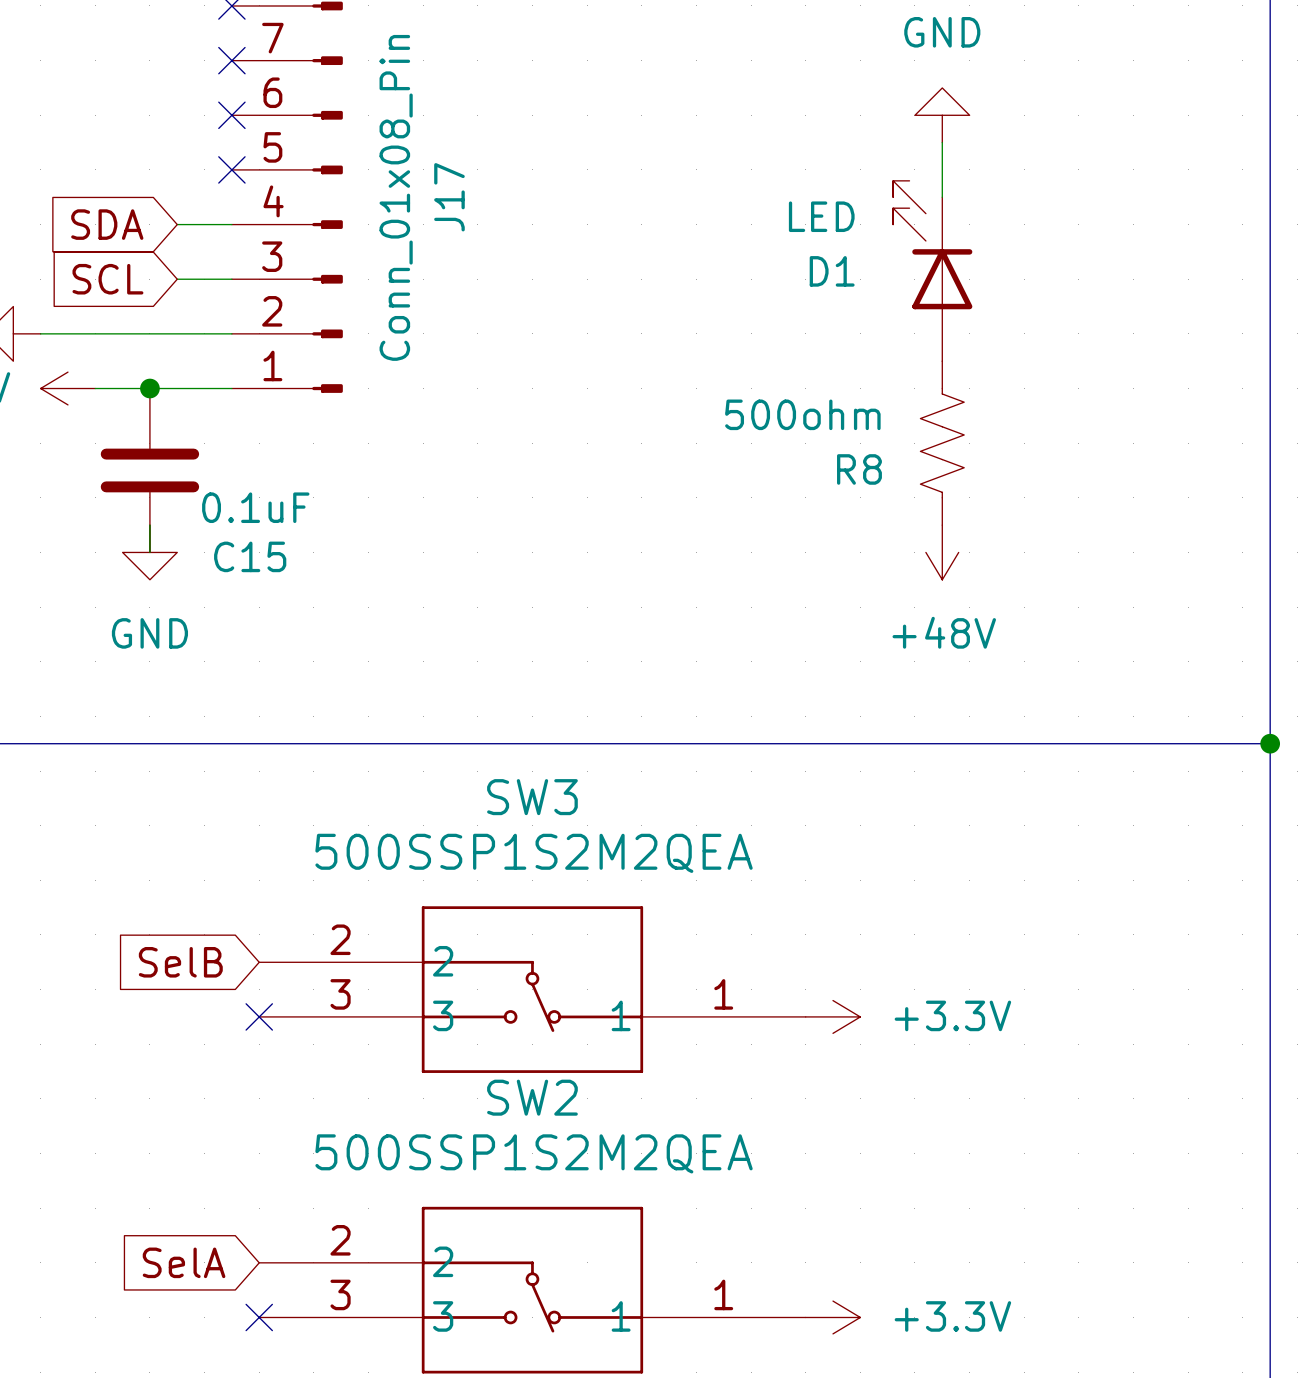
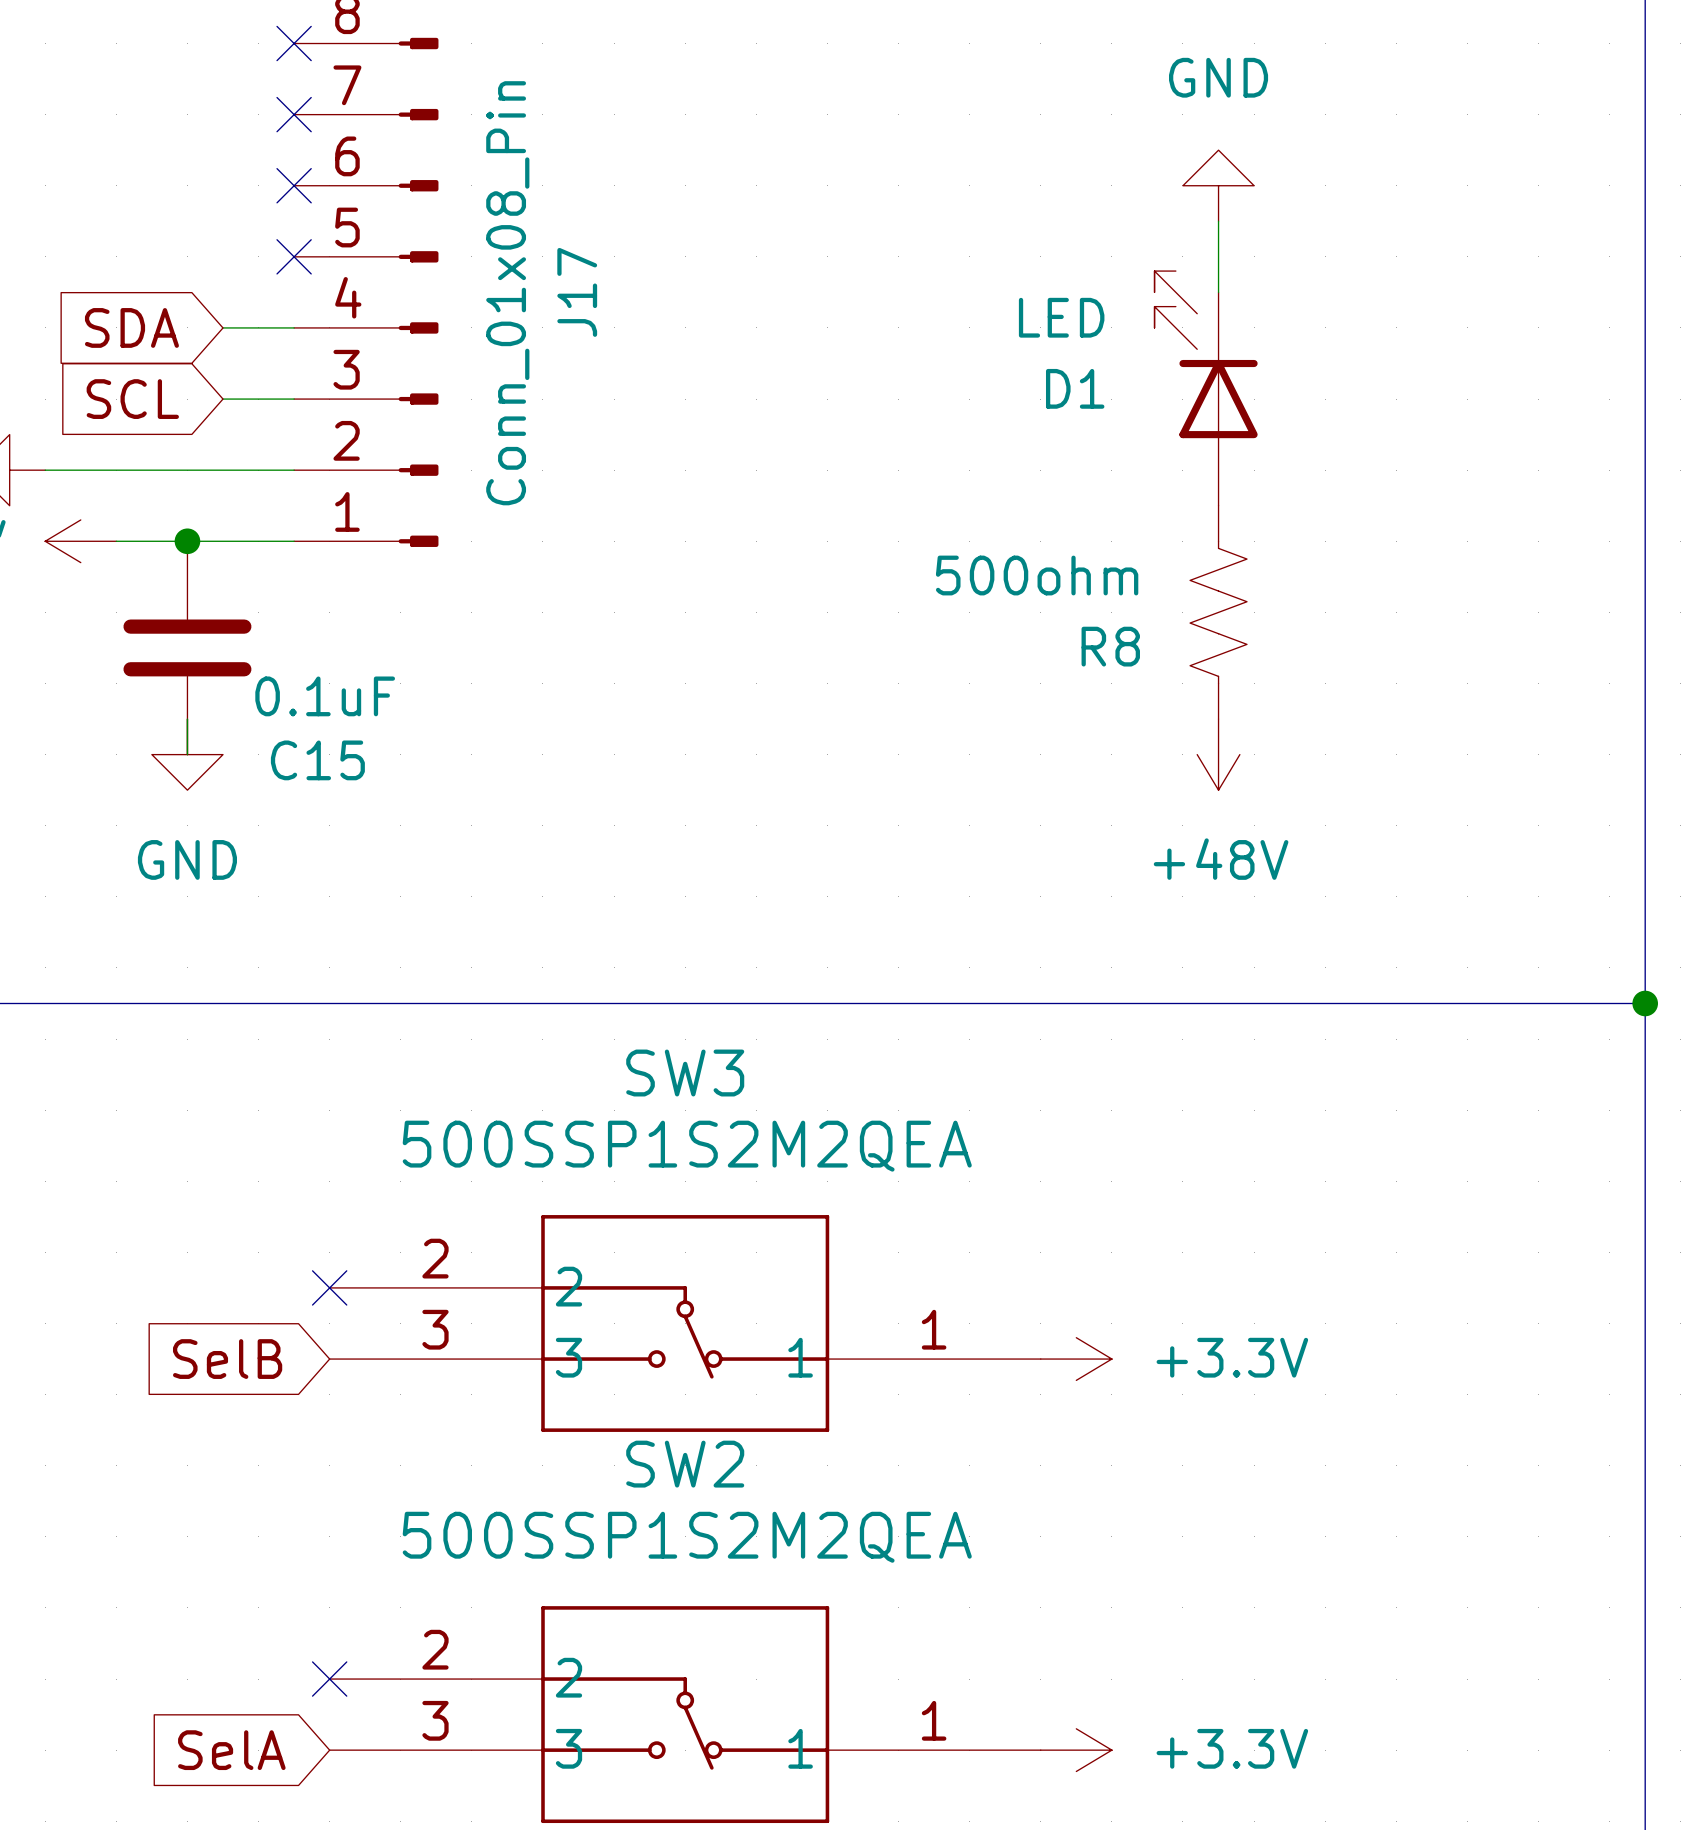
global label position: SelB (180, 962) -> SelB (227, 1359)
no-connect mark position: (259, 1016) -> (329, 1287)
global label position: SelA (184, 1262) -> SelA (231, 1750)
no-connect mark position: (259, 1317) -> (329, 1679)

